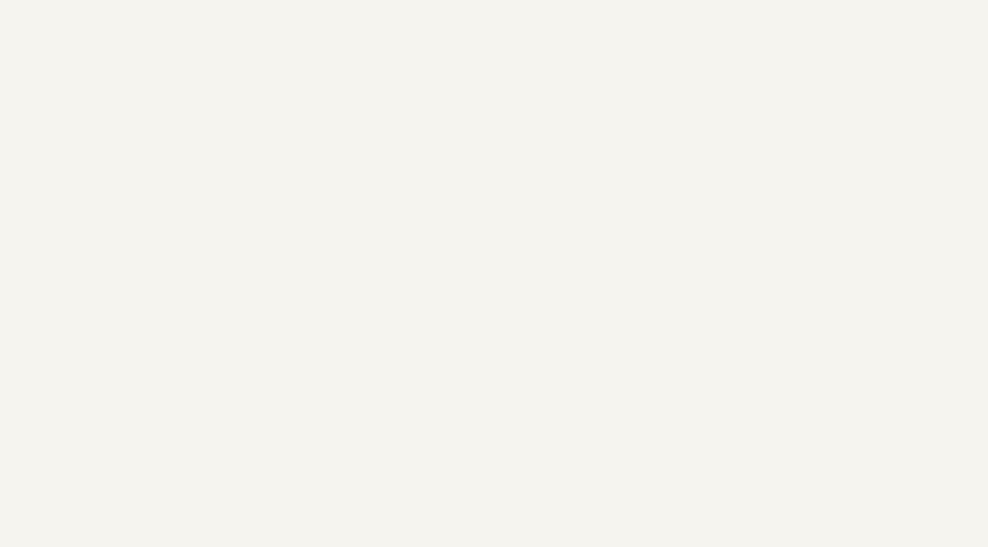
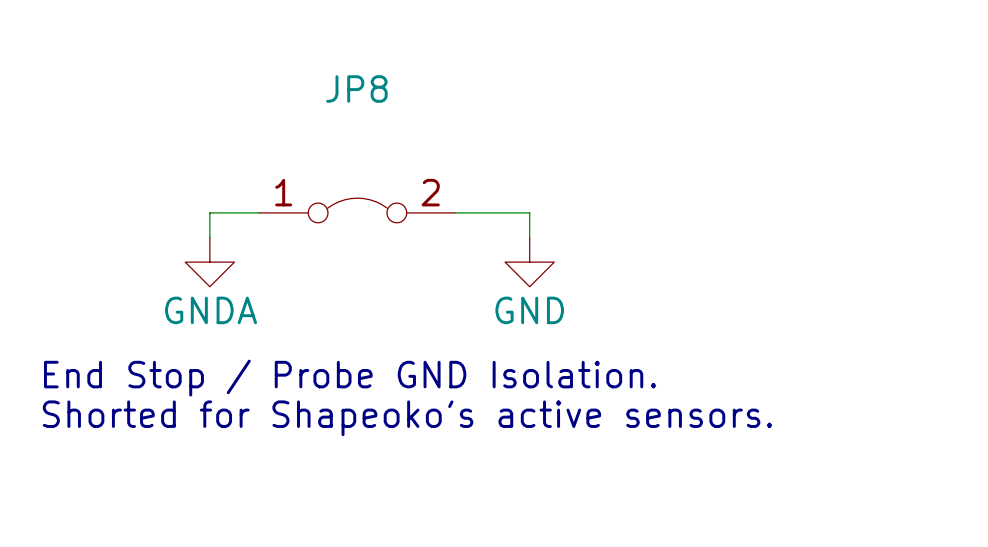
JP8: none -> (357, 210)
wire: none -> (259, 212) (209, 212) (209, 237)
wire: none -> (455, 212) (529, 212) (529, 237)
power symbol: none -> GNDA (209, 262)
power symbol: none -> GND (529, 262)
text: none -> End Stop / Probe GND Isolation. (350, 378)
text: none -> Shorted for Shapeoko's active sensors. (407, 418)

